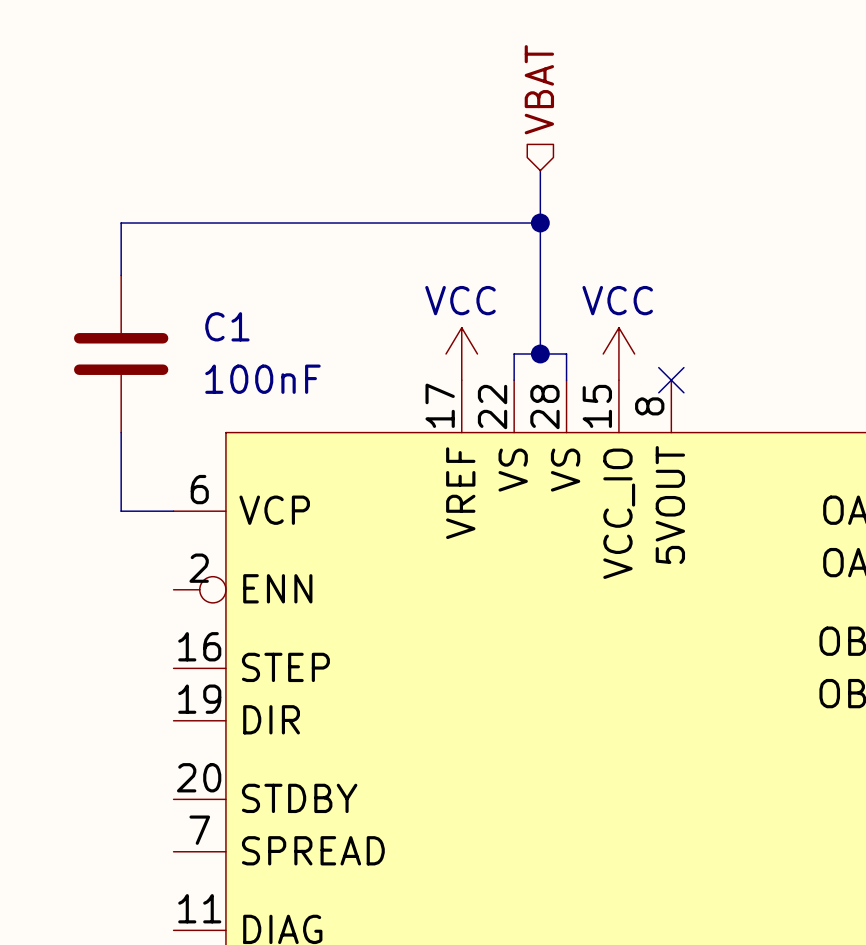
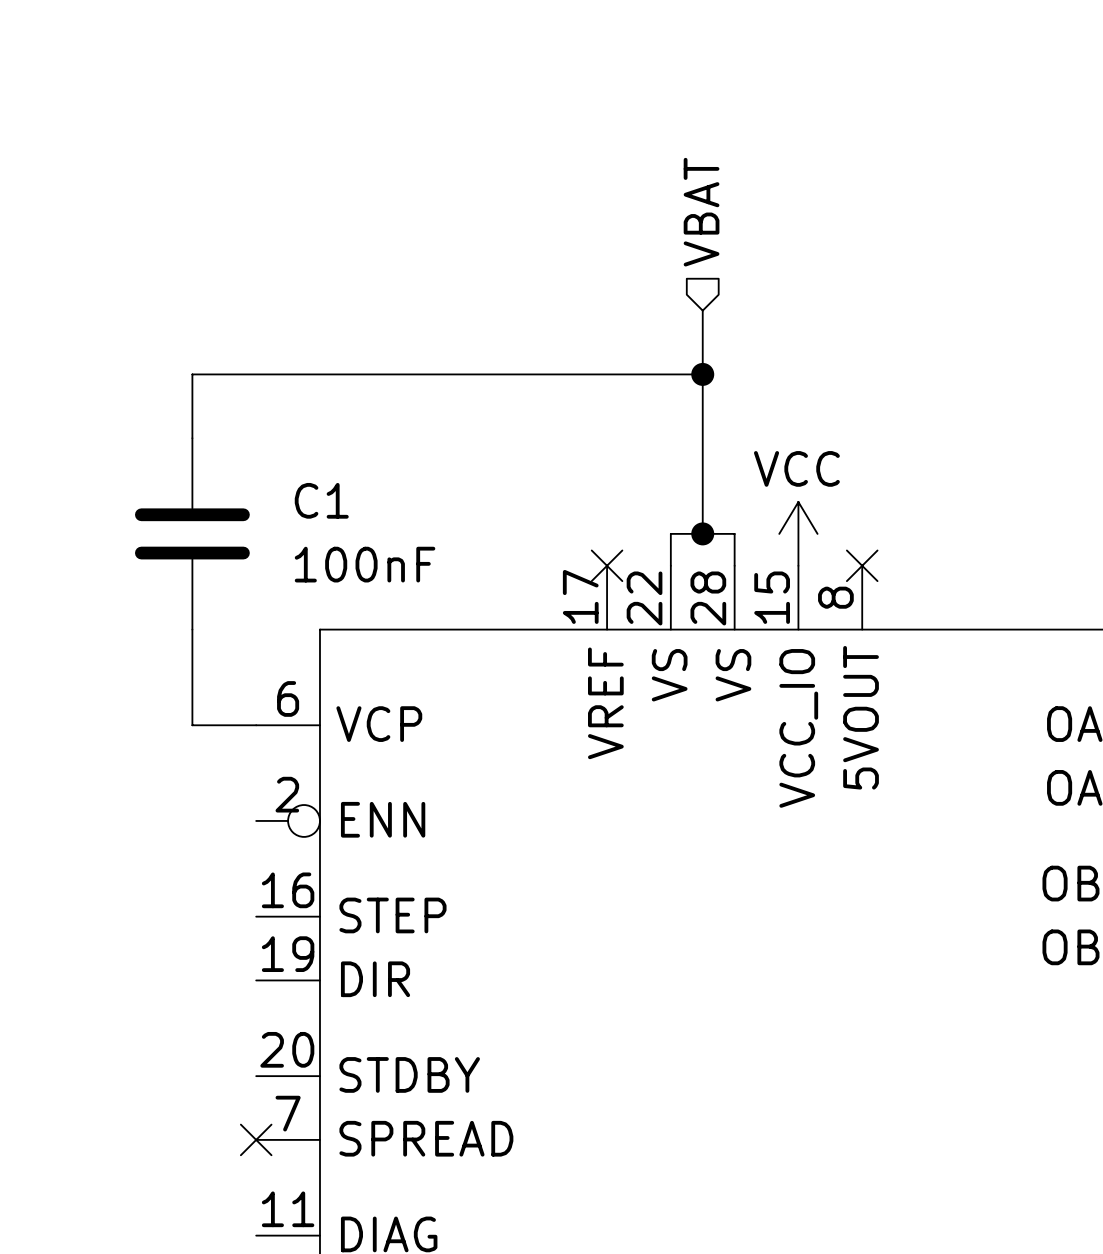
power symbol: VCC (461, 353) -> none
no-connect mark: none -> (607, 565)
no-connect mark: none -> (256, 1139)

